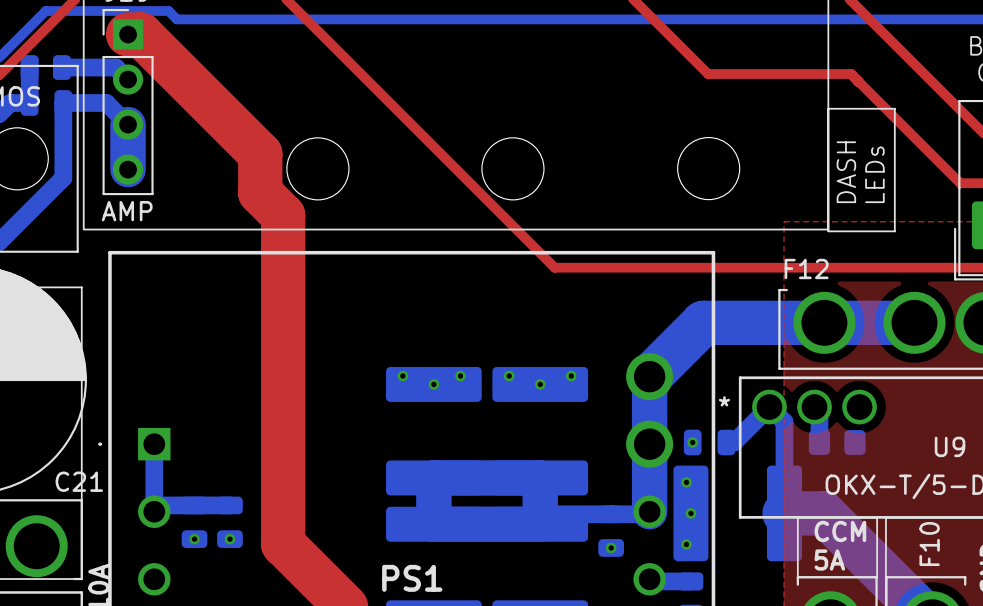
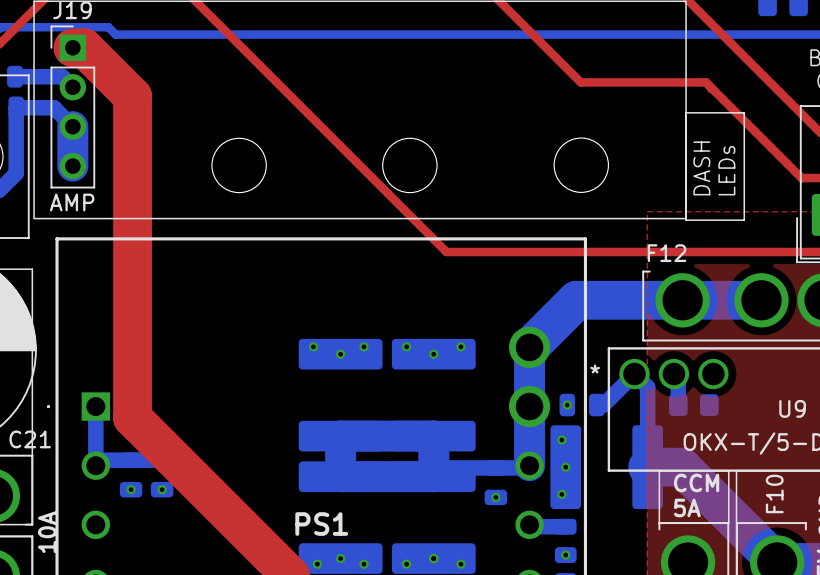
top track: (196, 90) (260, 154) (260, 192) (283, 215) (283, 544) -> (132, 96) (132, 417) (208, 493)

